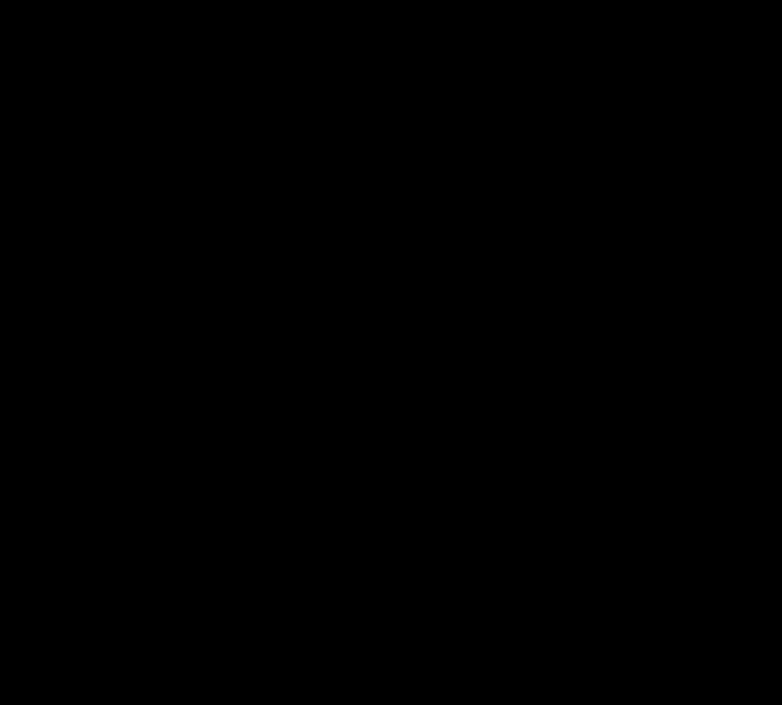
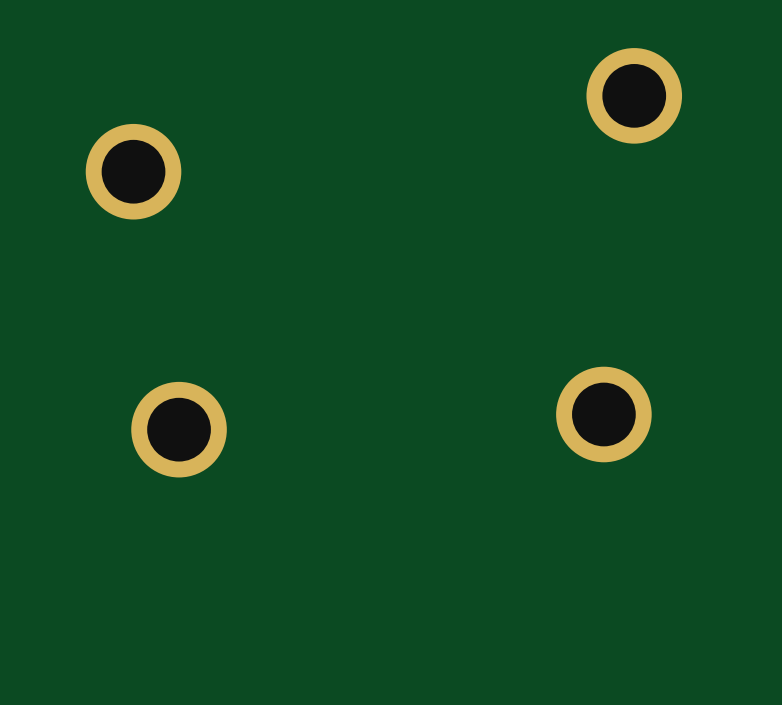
part: none -> (634, 95)
part: none -> (133, 171)
part: none -> (603, 414)
part: none -> (179, 429)

